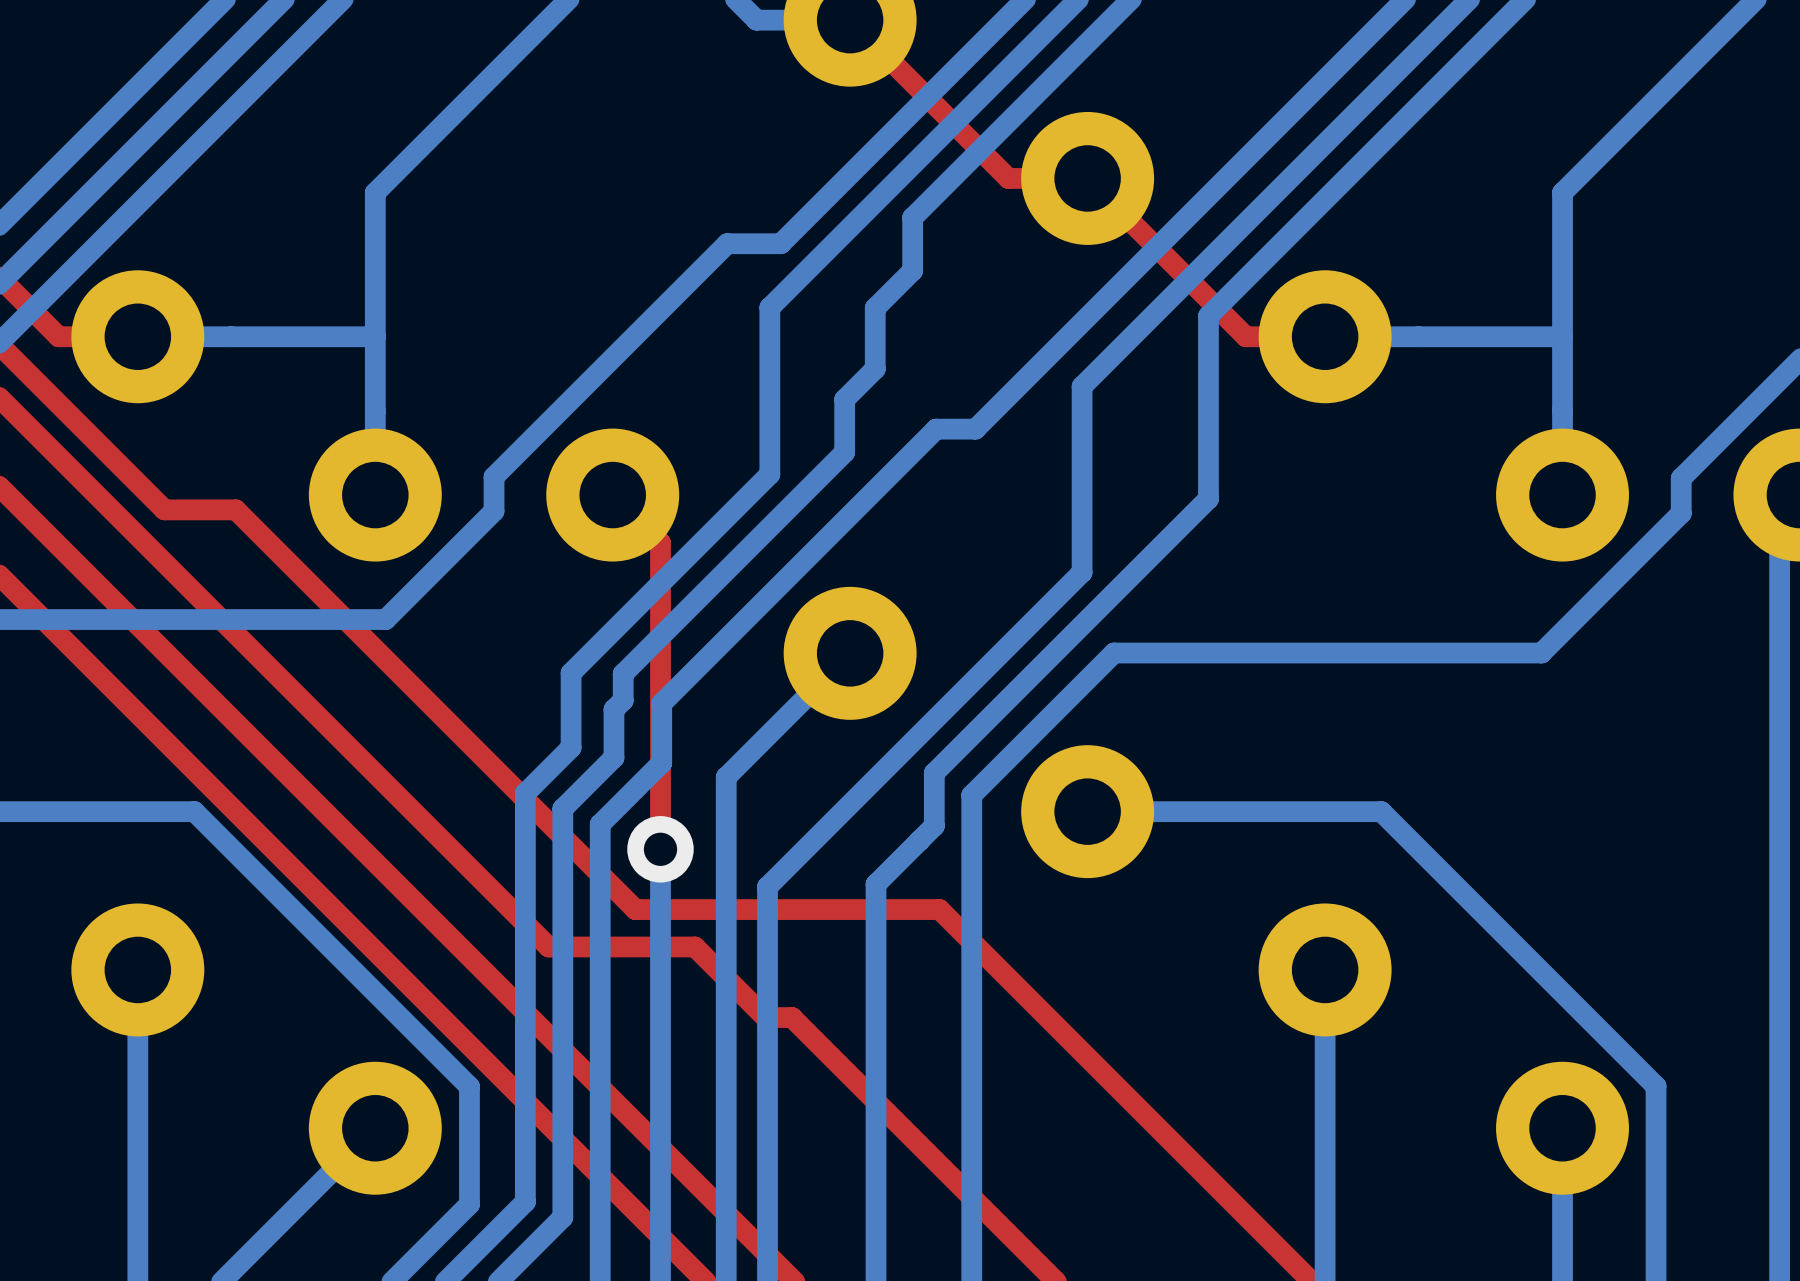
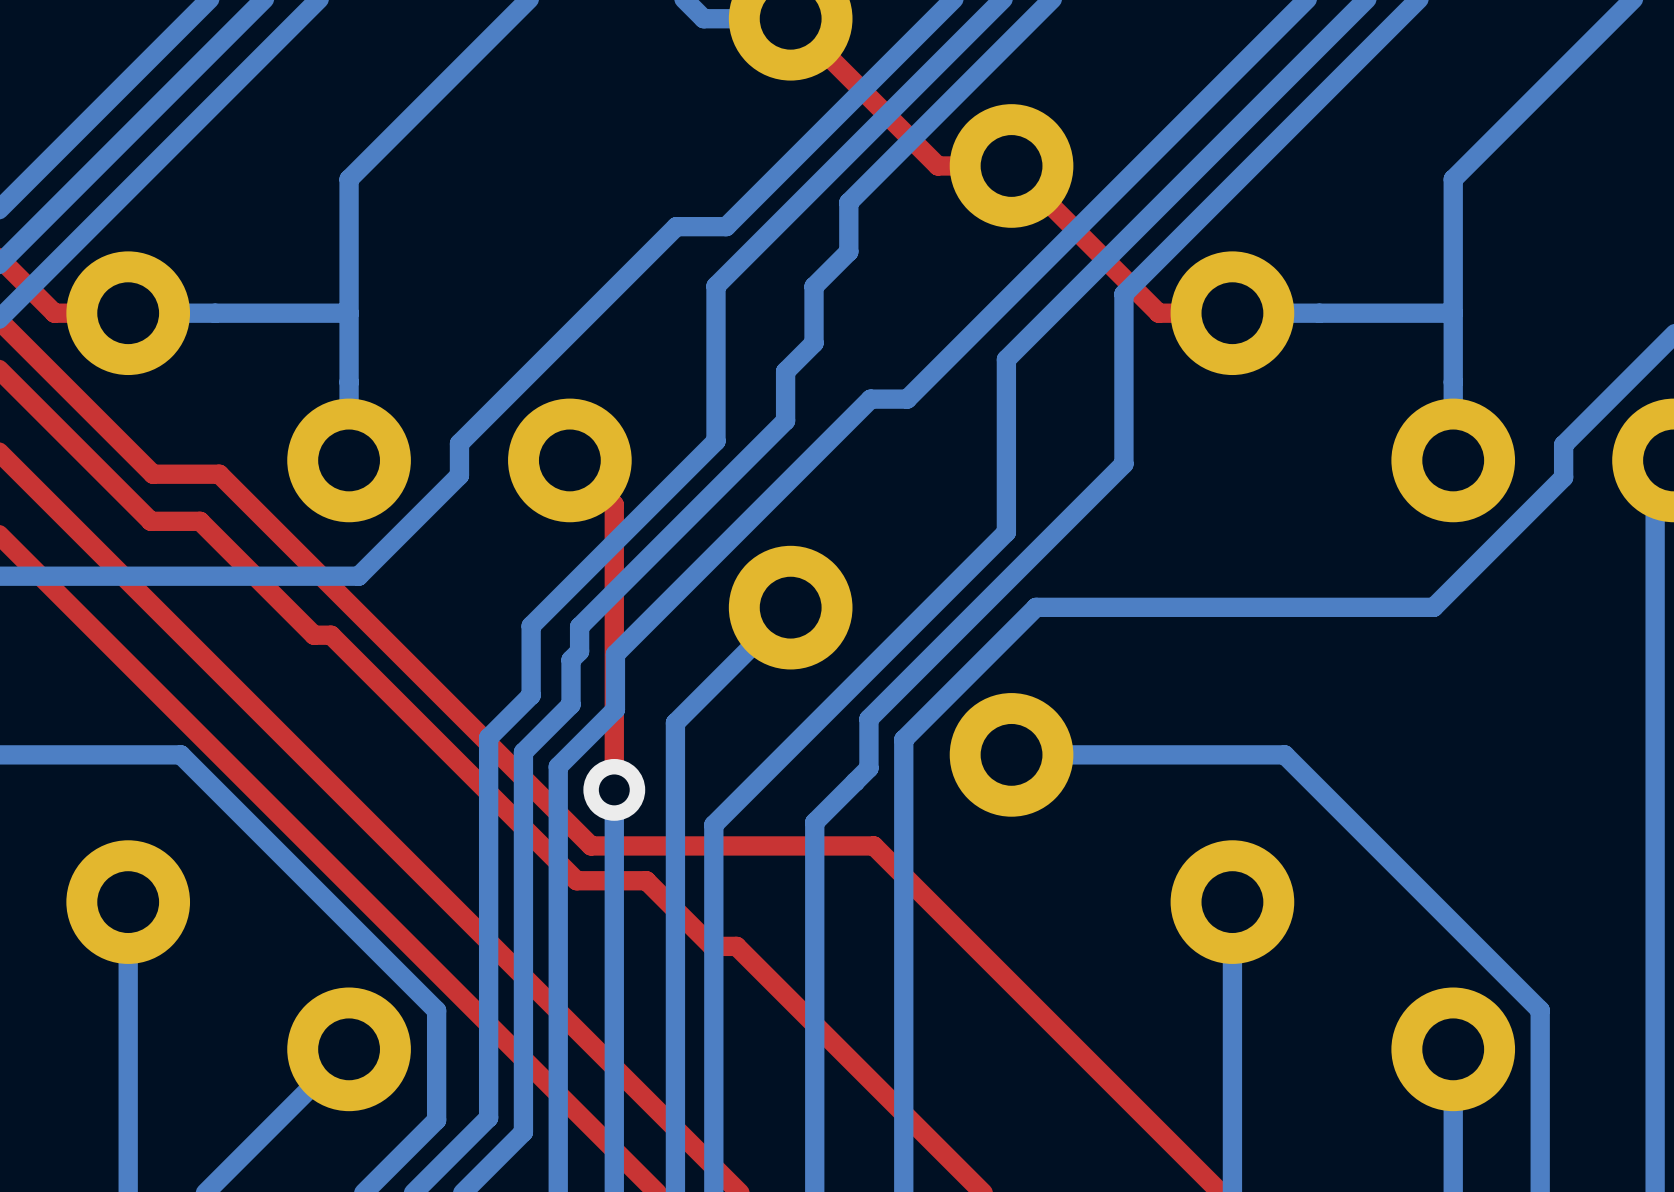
top track: (162, 560) (548, 946) (620, 946) -> (150, 521) (200, 521) (314, 635) (331, 635) (576, 880)

